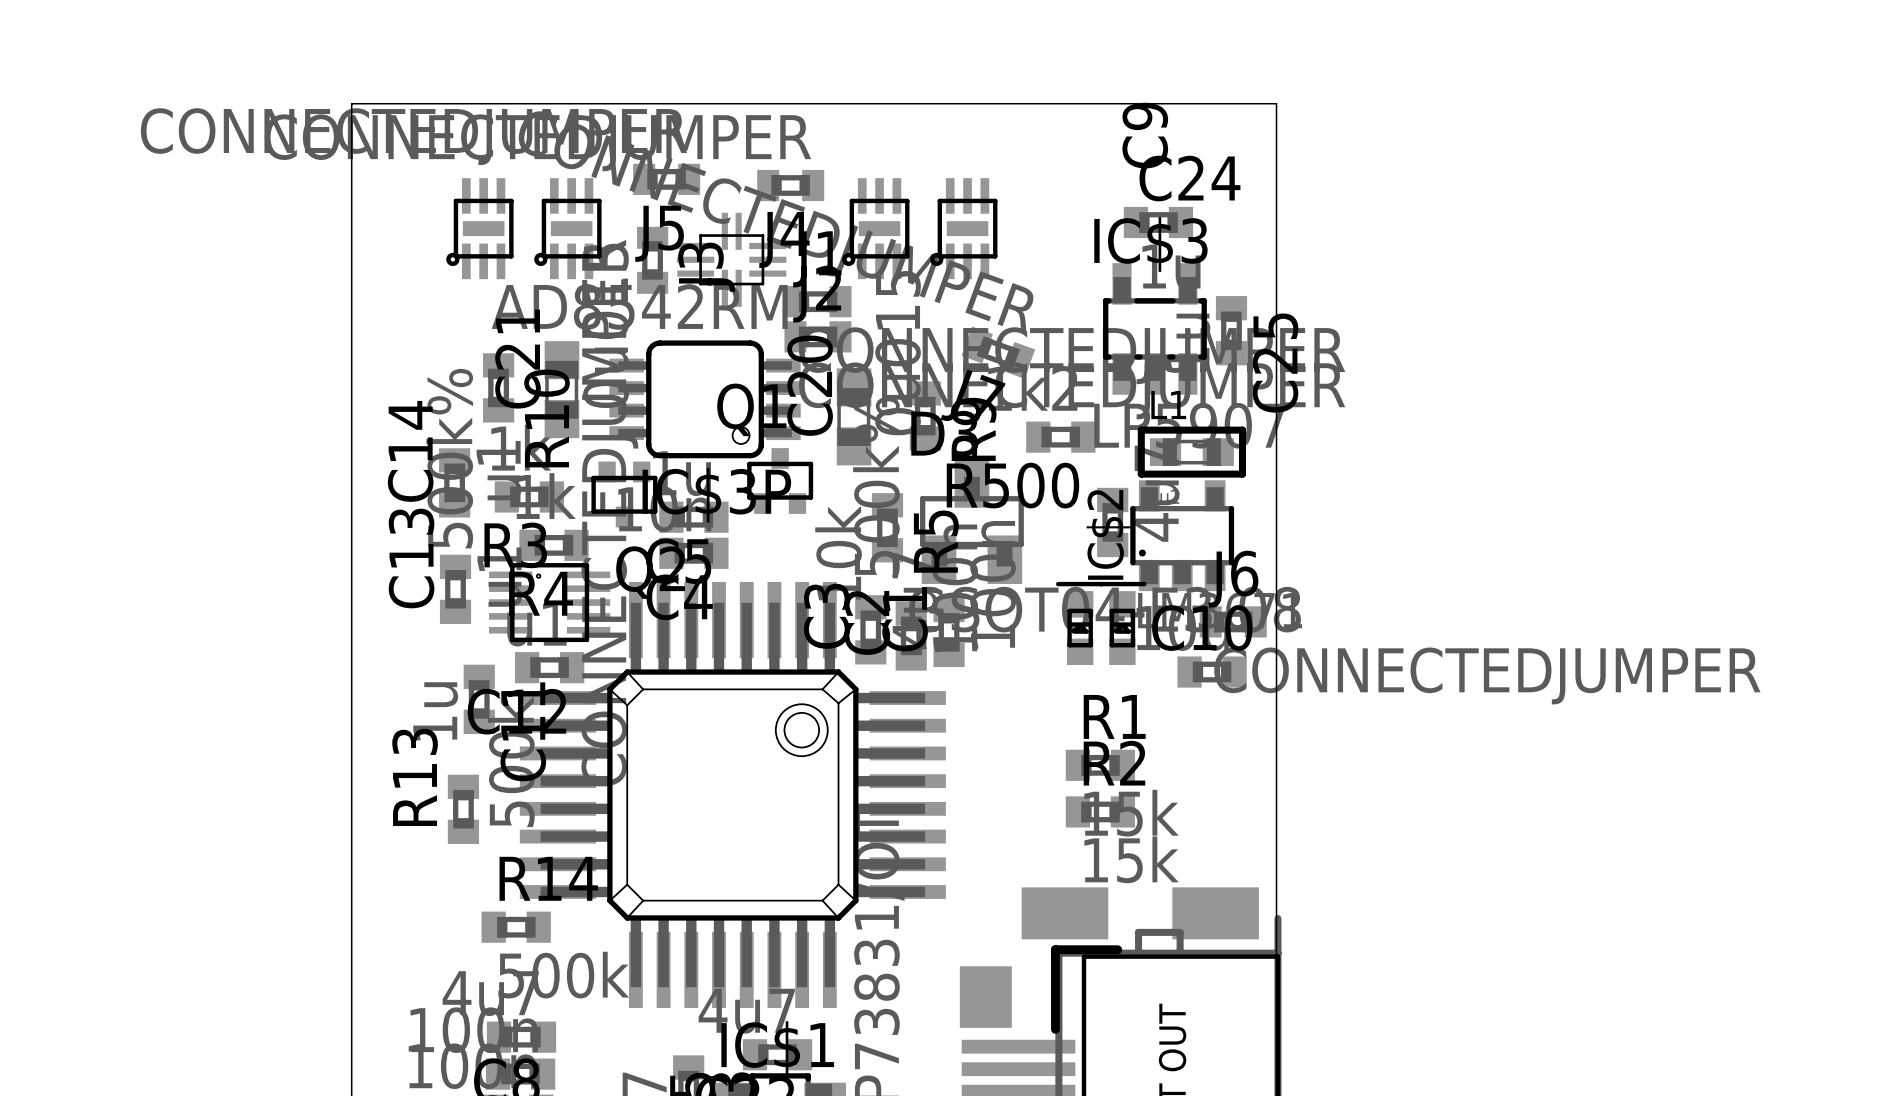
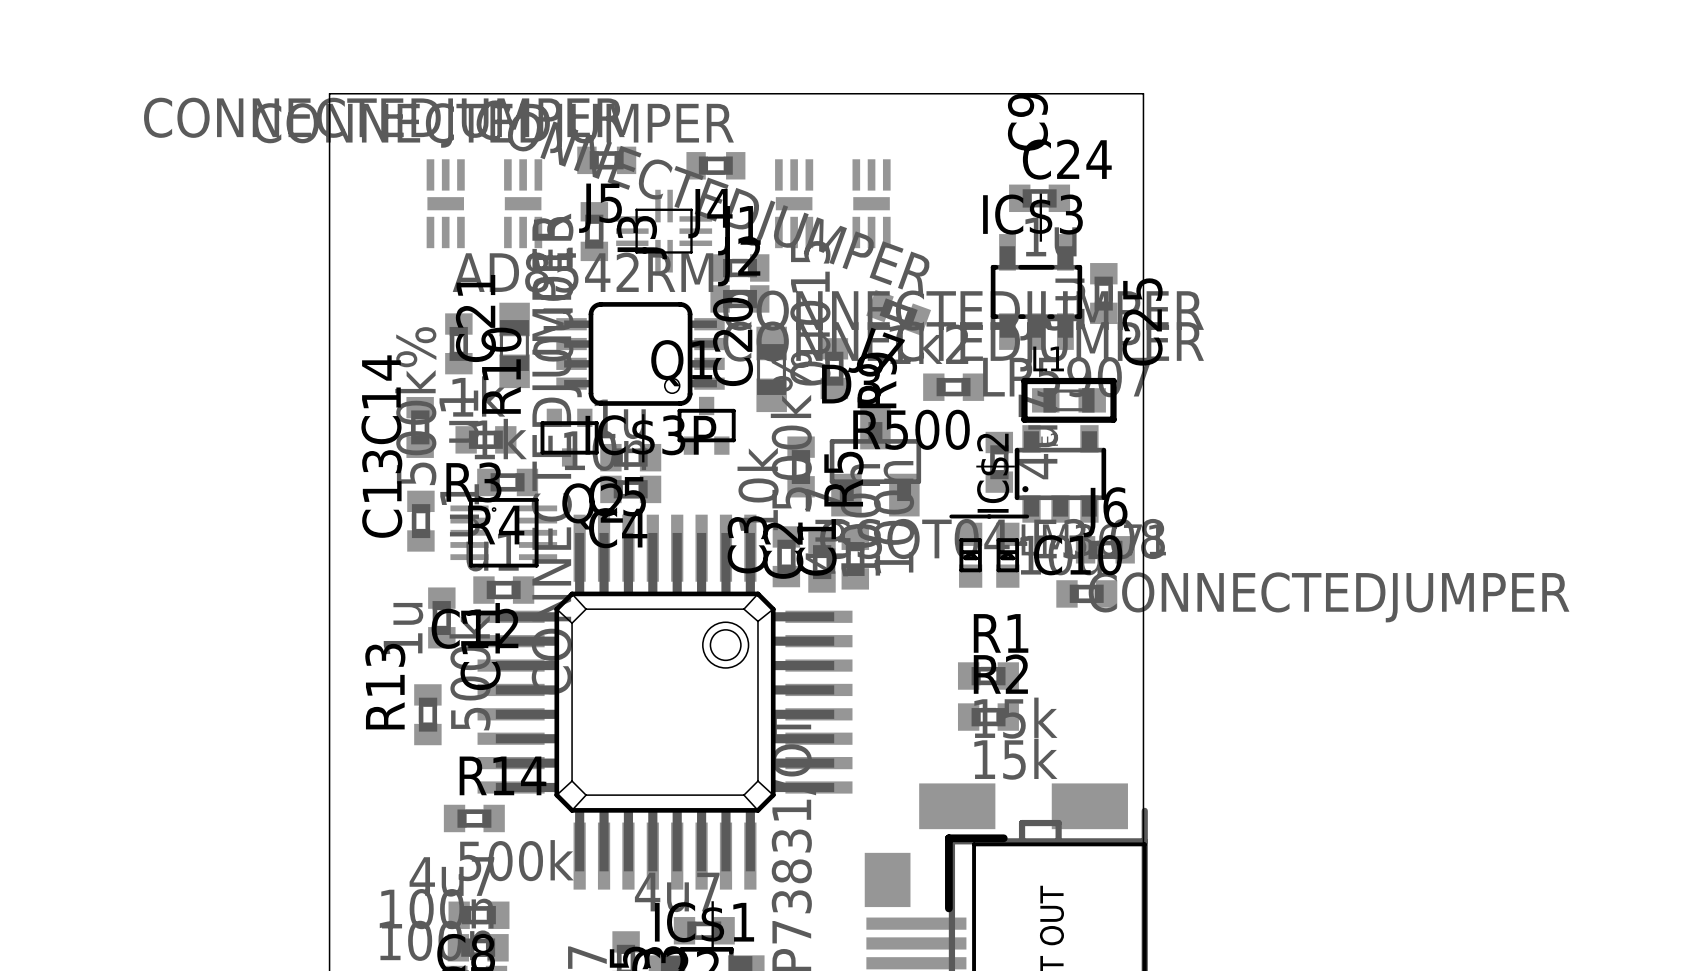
part footprint: [446, 178, 514, 280] -> [426, 159, 465, 249]
part footprint: [534, 178, 602, 280] -> [504, 159, 543, 249]
part footprint: [842, 178, 910, 280] -> [775, 159, 814, 249]
part footprint: [930, 178, 998, 280] -> [852, 159, 891, 249]

